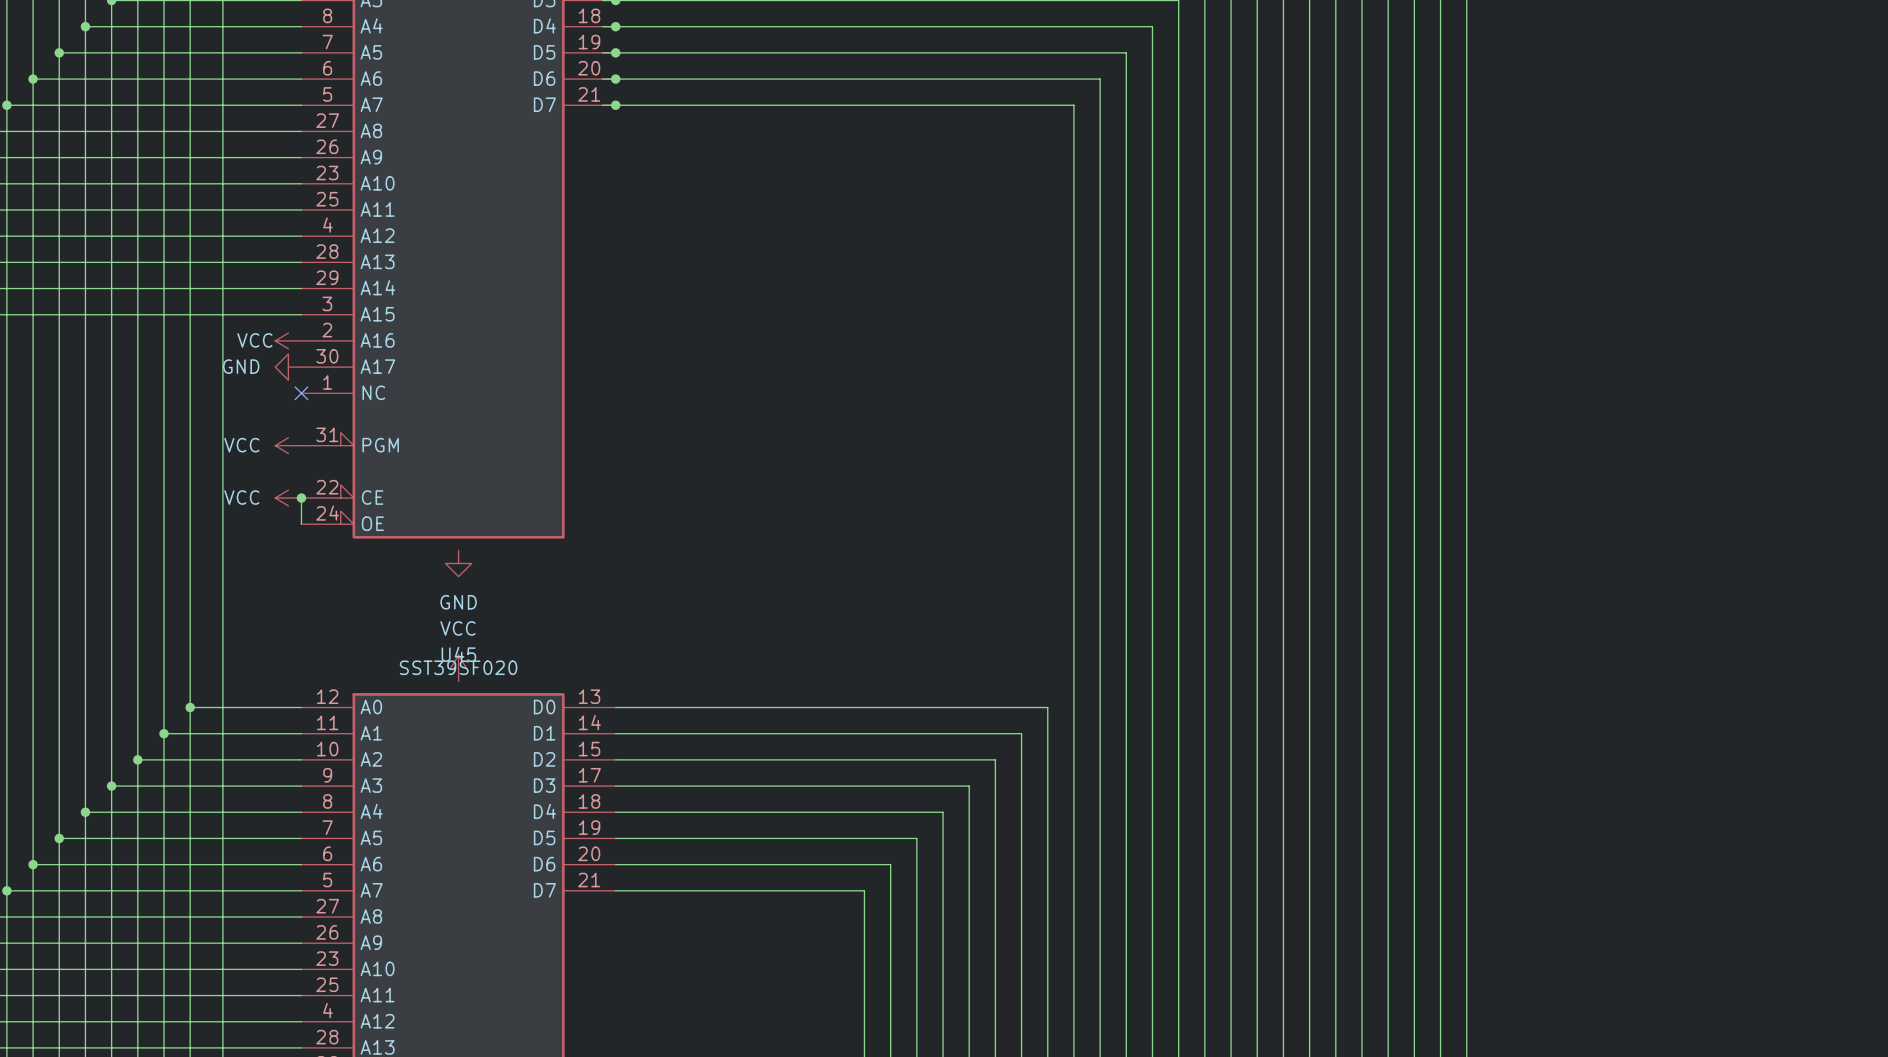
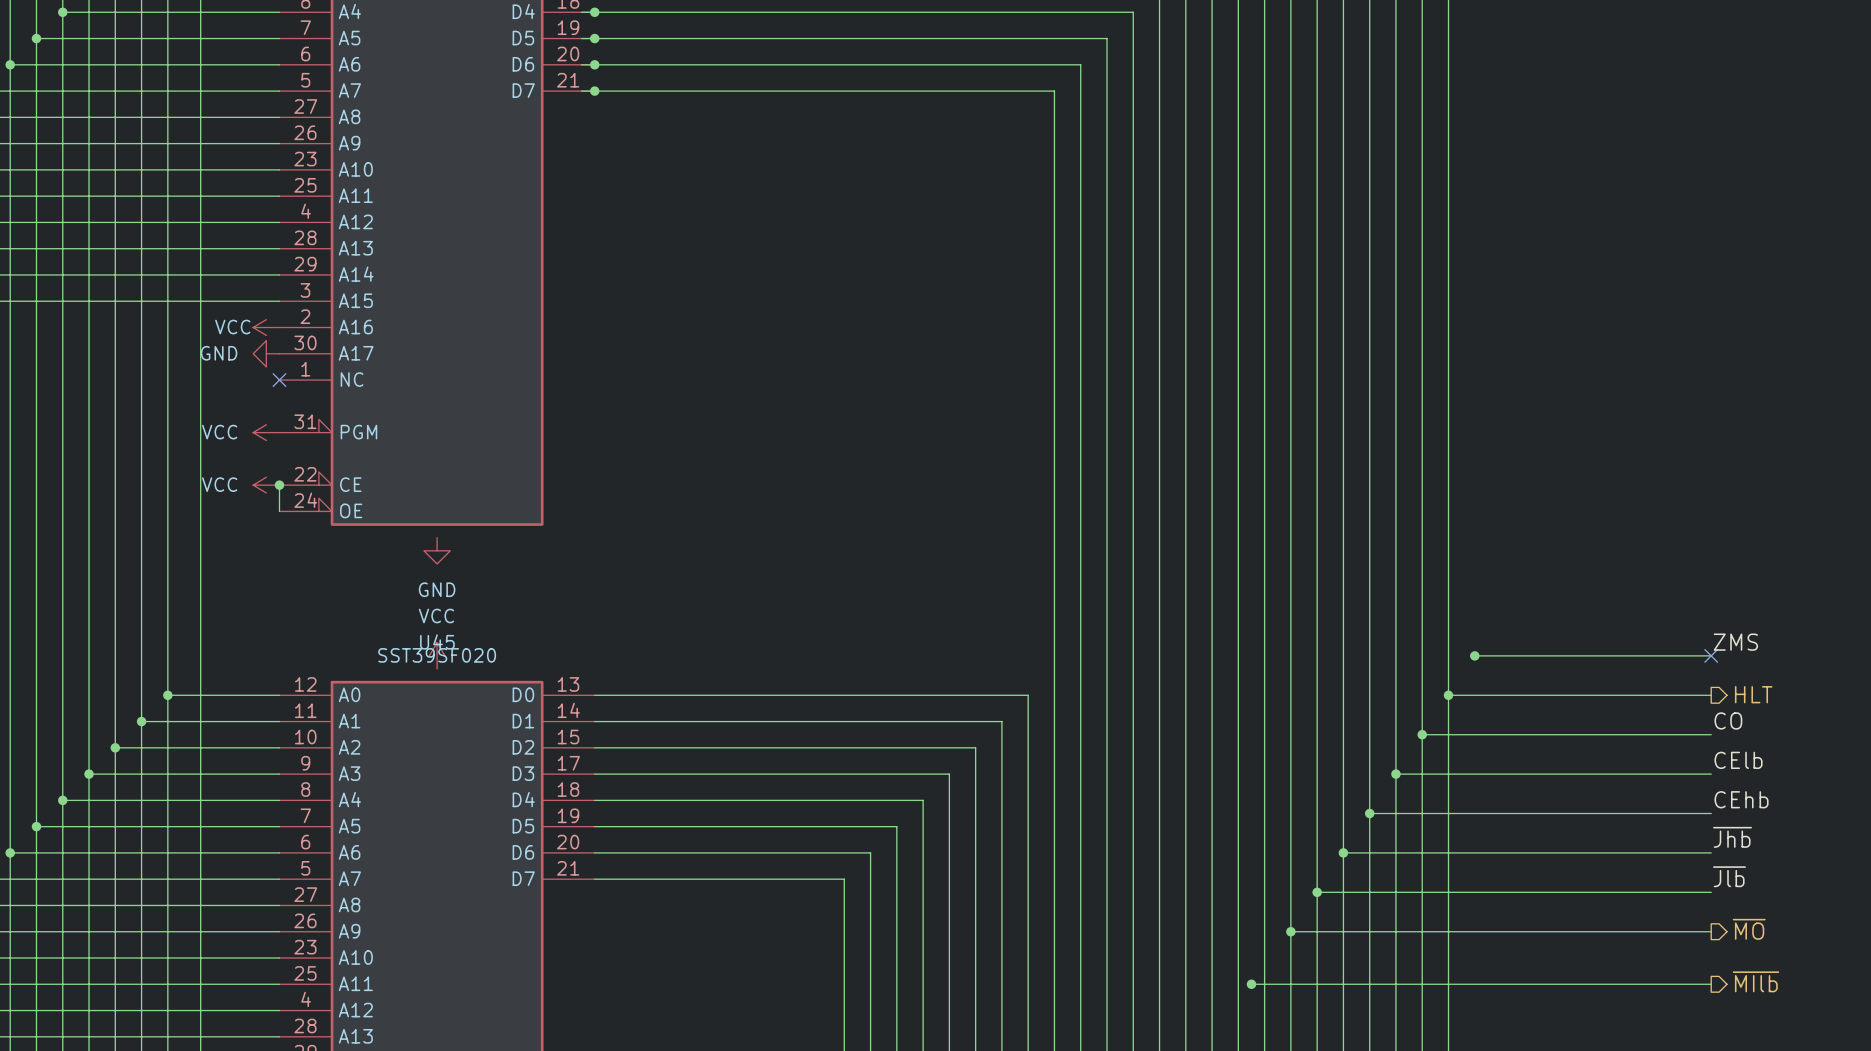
label: none -> ZMS (1735, 642)
wire: none -> (1474, 655) (1711, 655)
junction: none -> (1474, 655)
no-connect mark: none -> (1711, 655)
hierarchical label: none -> HLT (1753, 694)
wire: none -> (1448, 695) (1711, 695)
junction: none -> (1448, 695)
label: none -> CO (1728, 720)
wire: none -> (1422, 734) (1711, 734)
junction: none -> (1422, 734)
label: none -> CElb (1738, 760)
wire: none -> (1395, 774) (1711, 774)
junction: none -> (1395, 774)
label: none -> CEhb (1741, 799)
wire: none -> (1369, 813) (1711, 813)
junction: none -> (1369, 813)
label: none -> ~{Jhb} (1732, 837)
wire: none -> (1343, 852) (1711, 852)
junction: none -> (1343, 852)
label: none -> ~{Jlb} (1729, 876)
wire: none -> (1317, 892) (1711, 892)
junction: none -> (1317, 892)
hierarchical label: none -> ~{MO} (1749, 929)
wire: none -> (1290, 931) (1711, 931)
junction: none -> (1290, 931)
hierarchical label: none -> ~{MIlb} (1755, 981)
wire: none -> (1251, 984) (1711, 984)
junction: none -> (1251, 984)

